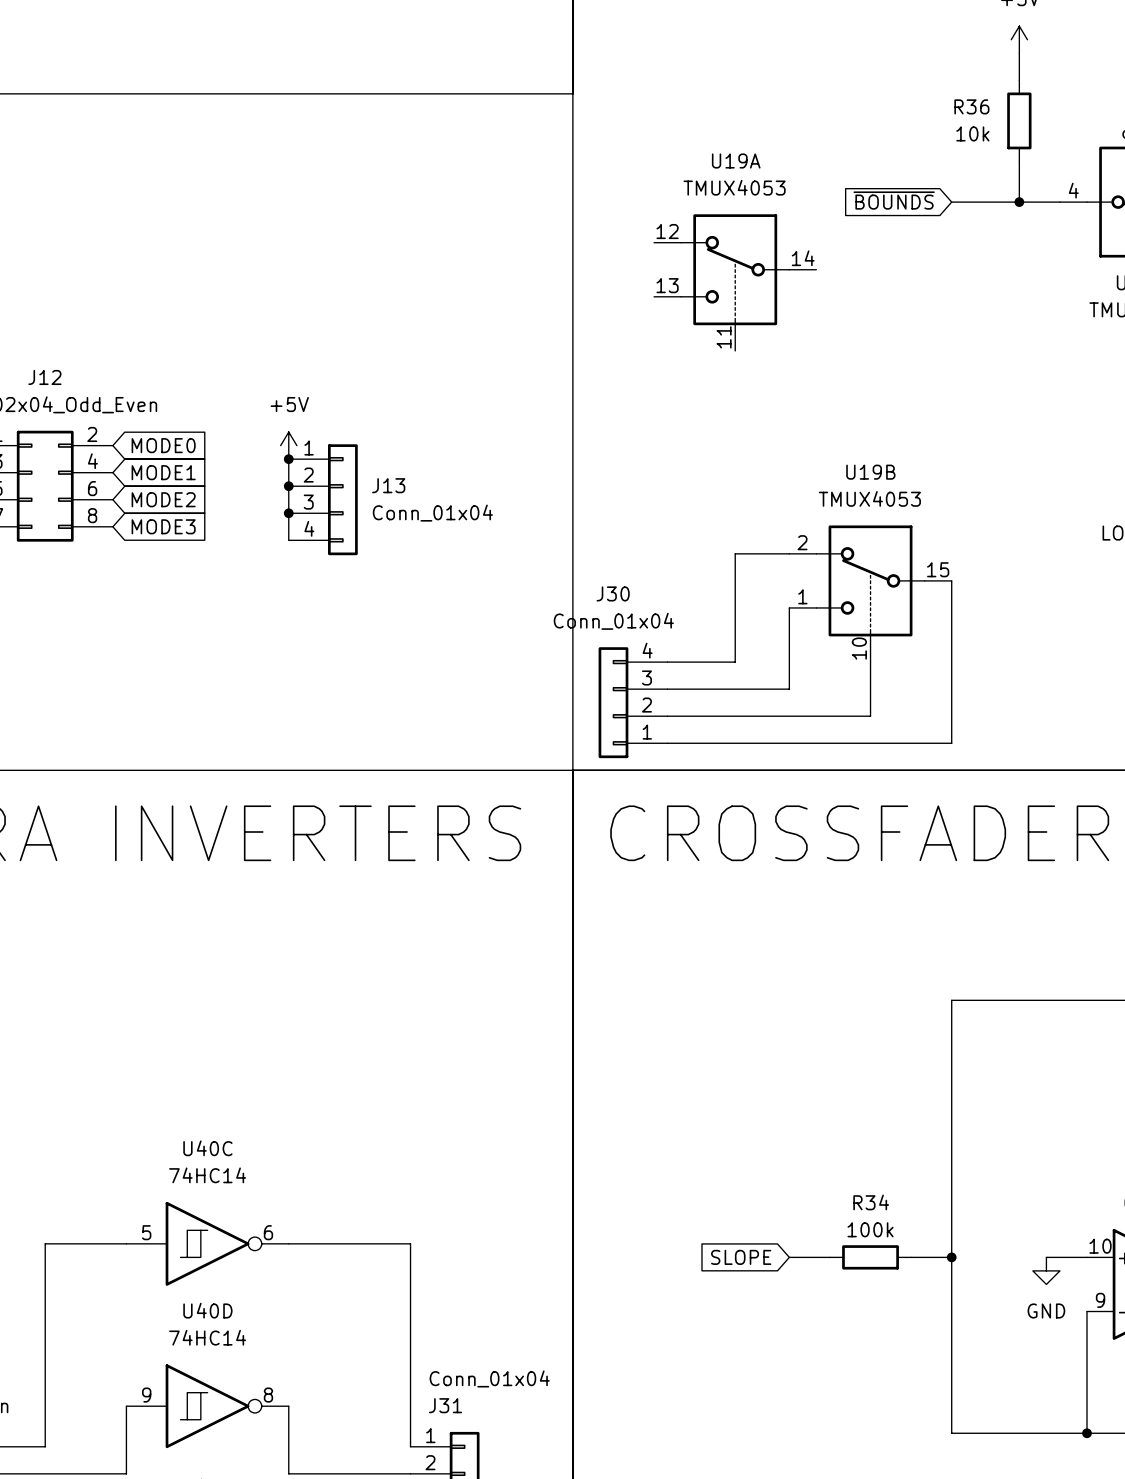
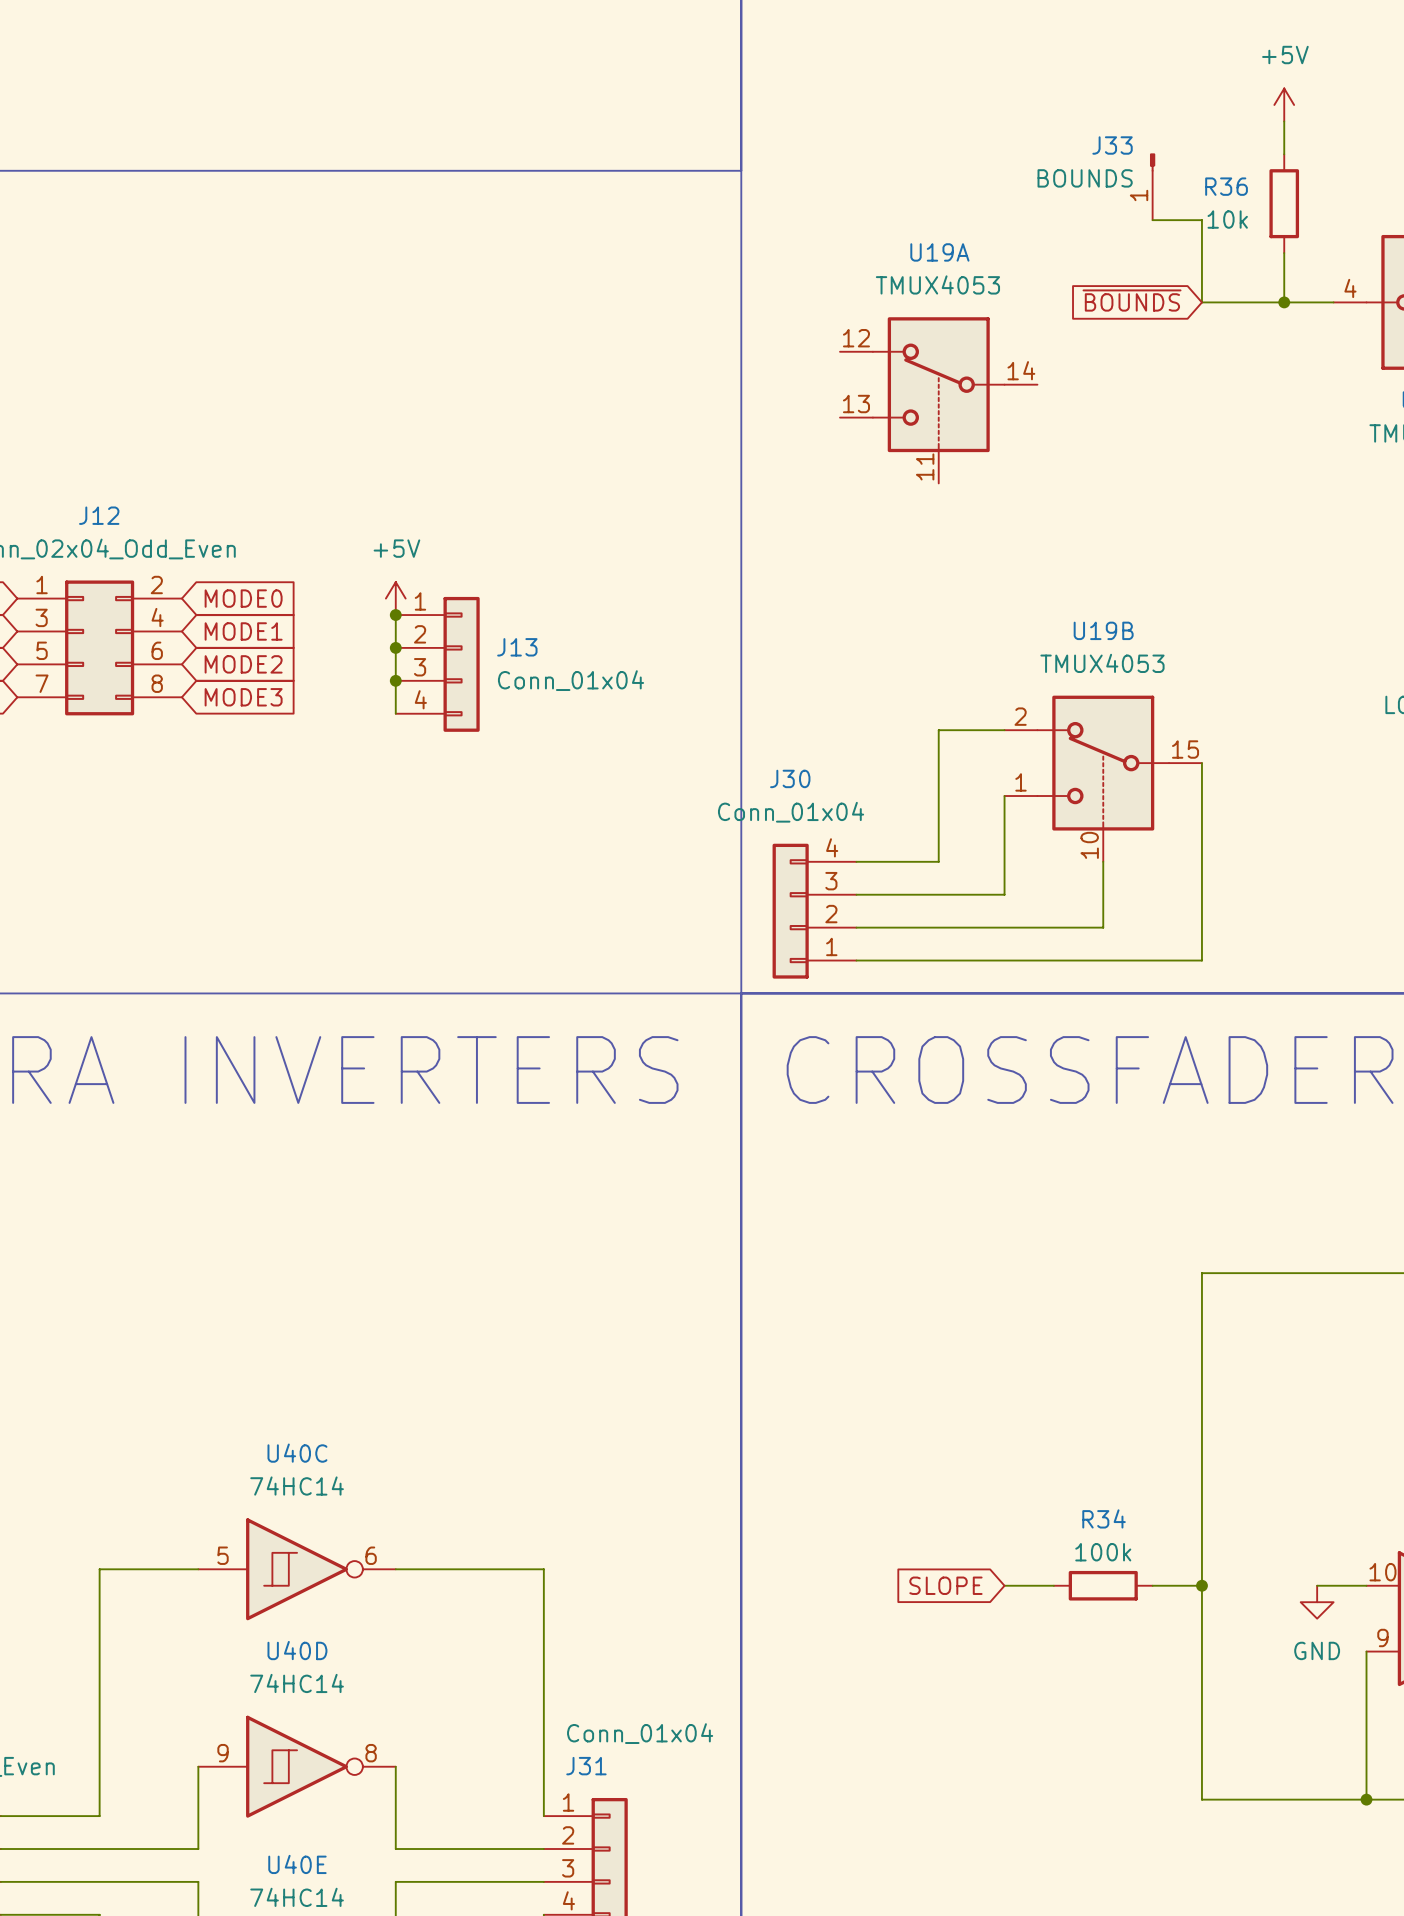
J33: none -> BOUNDS (1152, 186)
wire: none -> (1152, 220) (1201, 220) (1201, 302)

